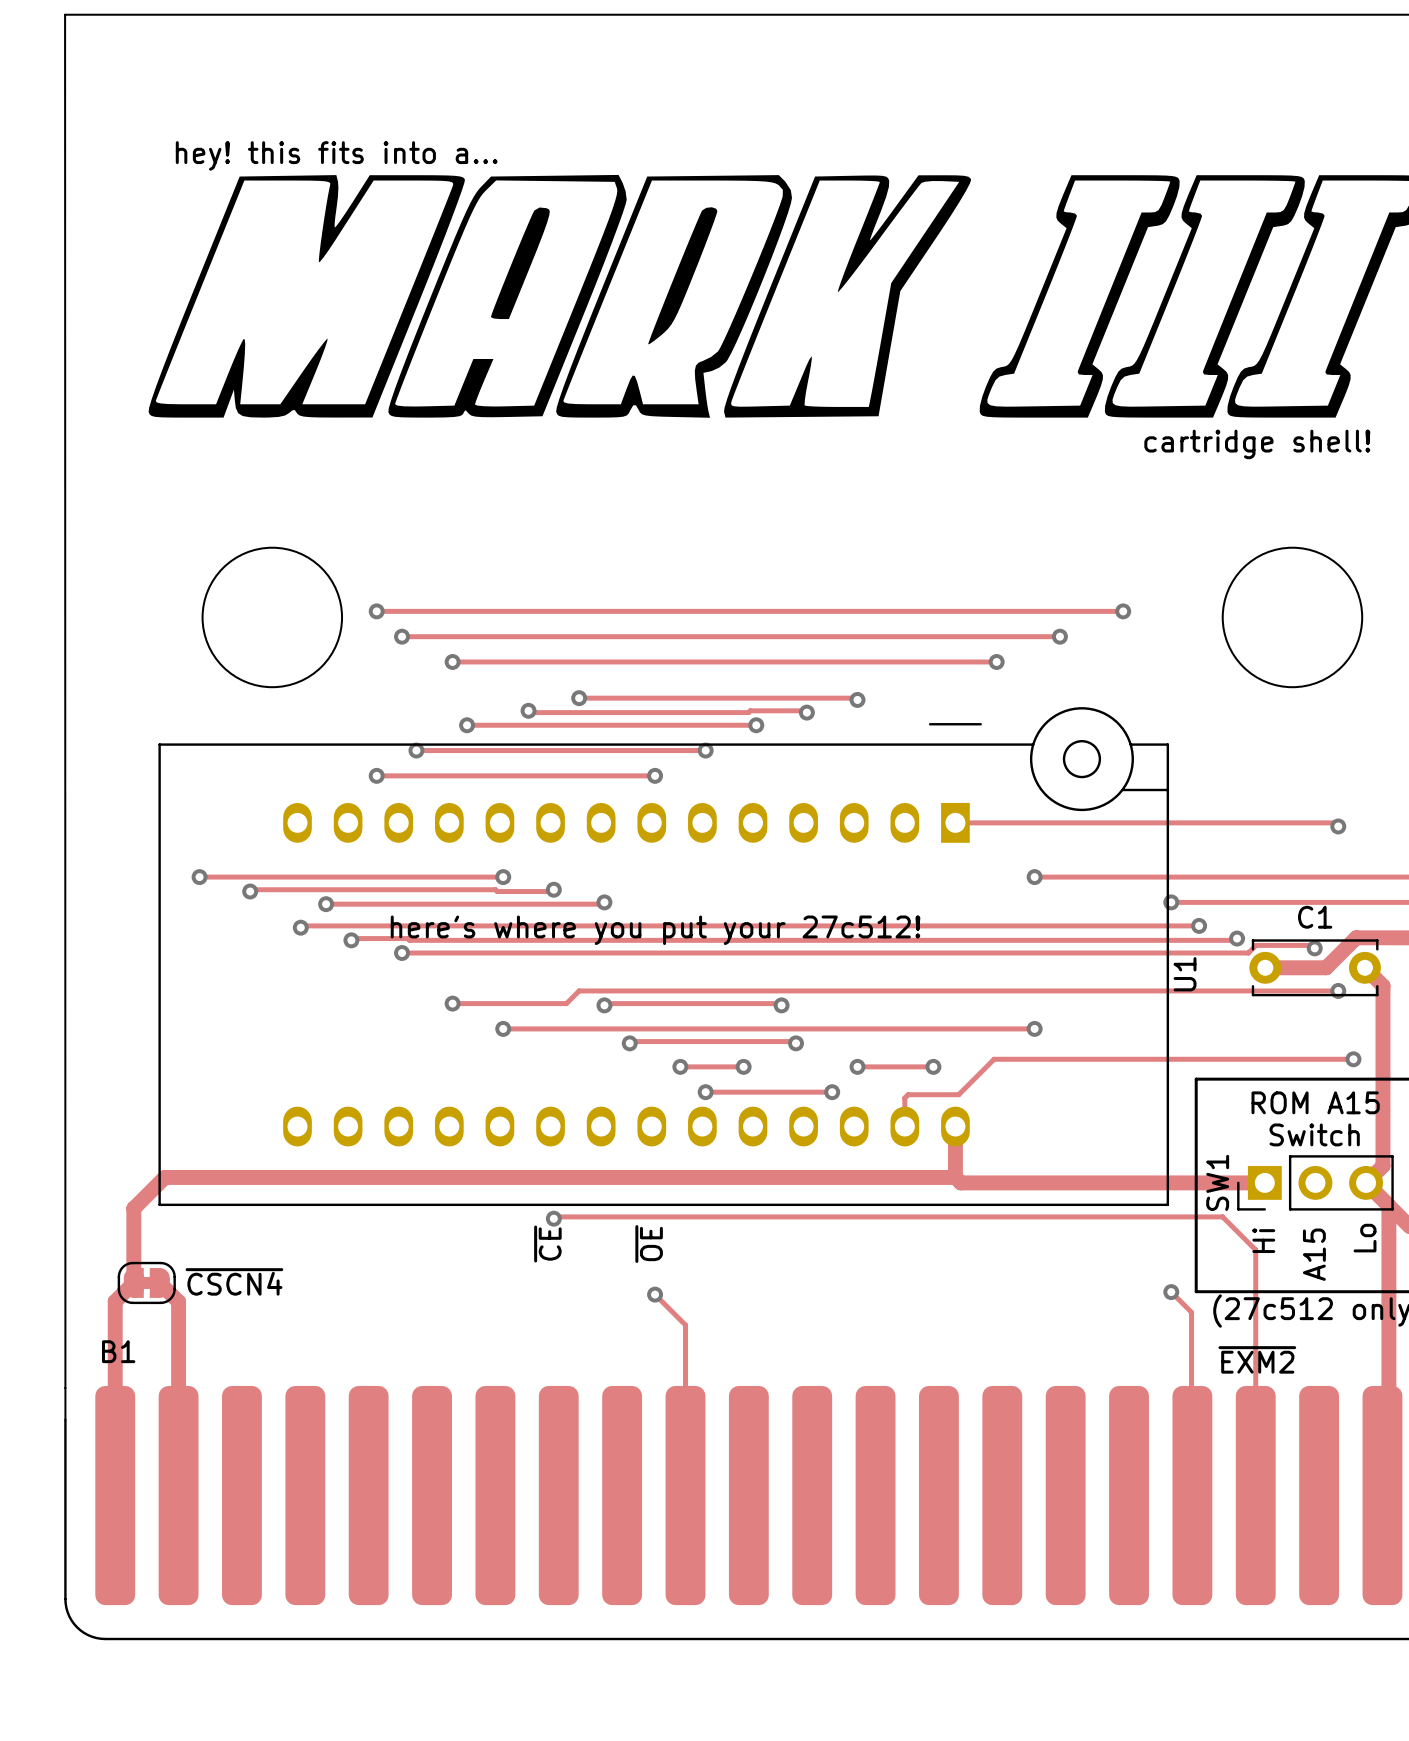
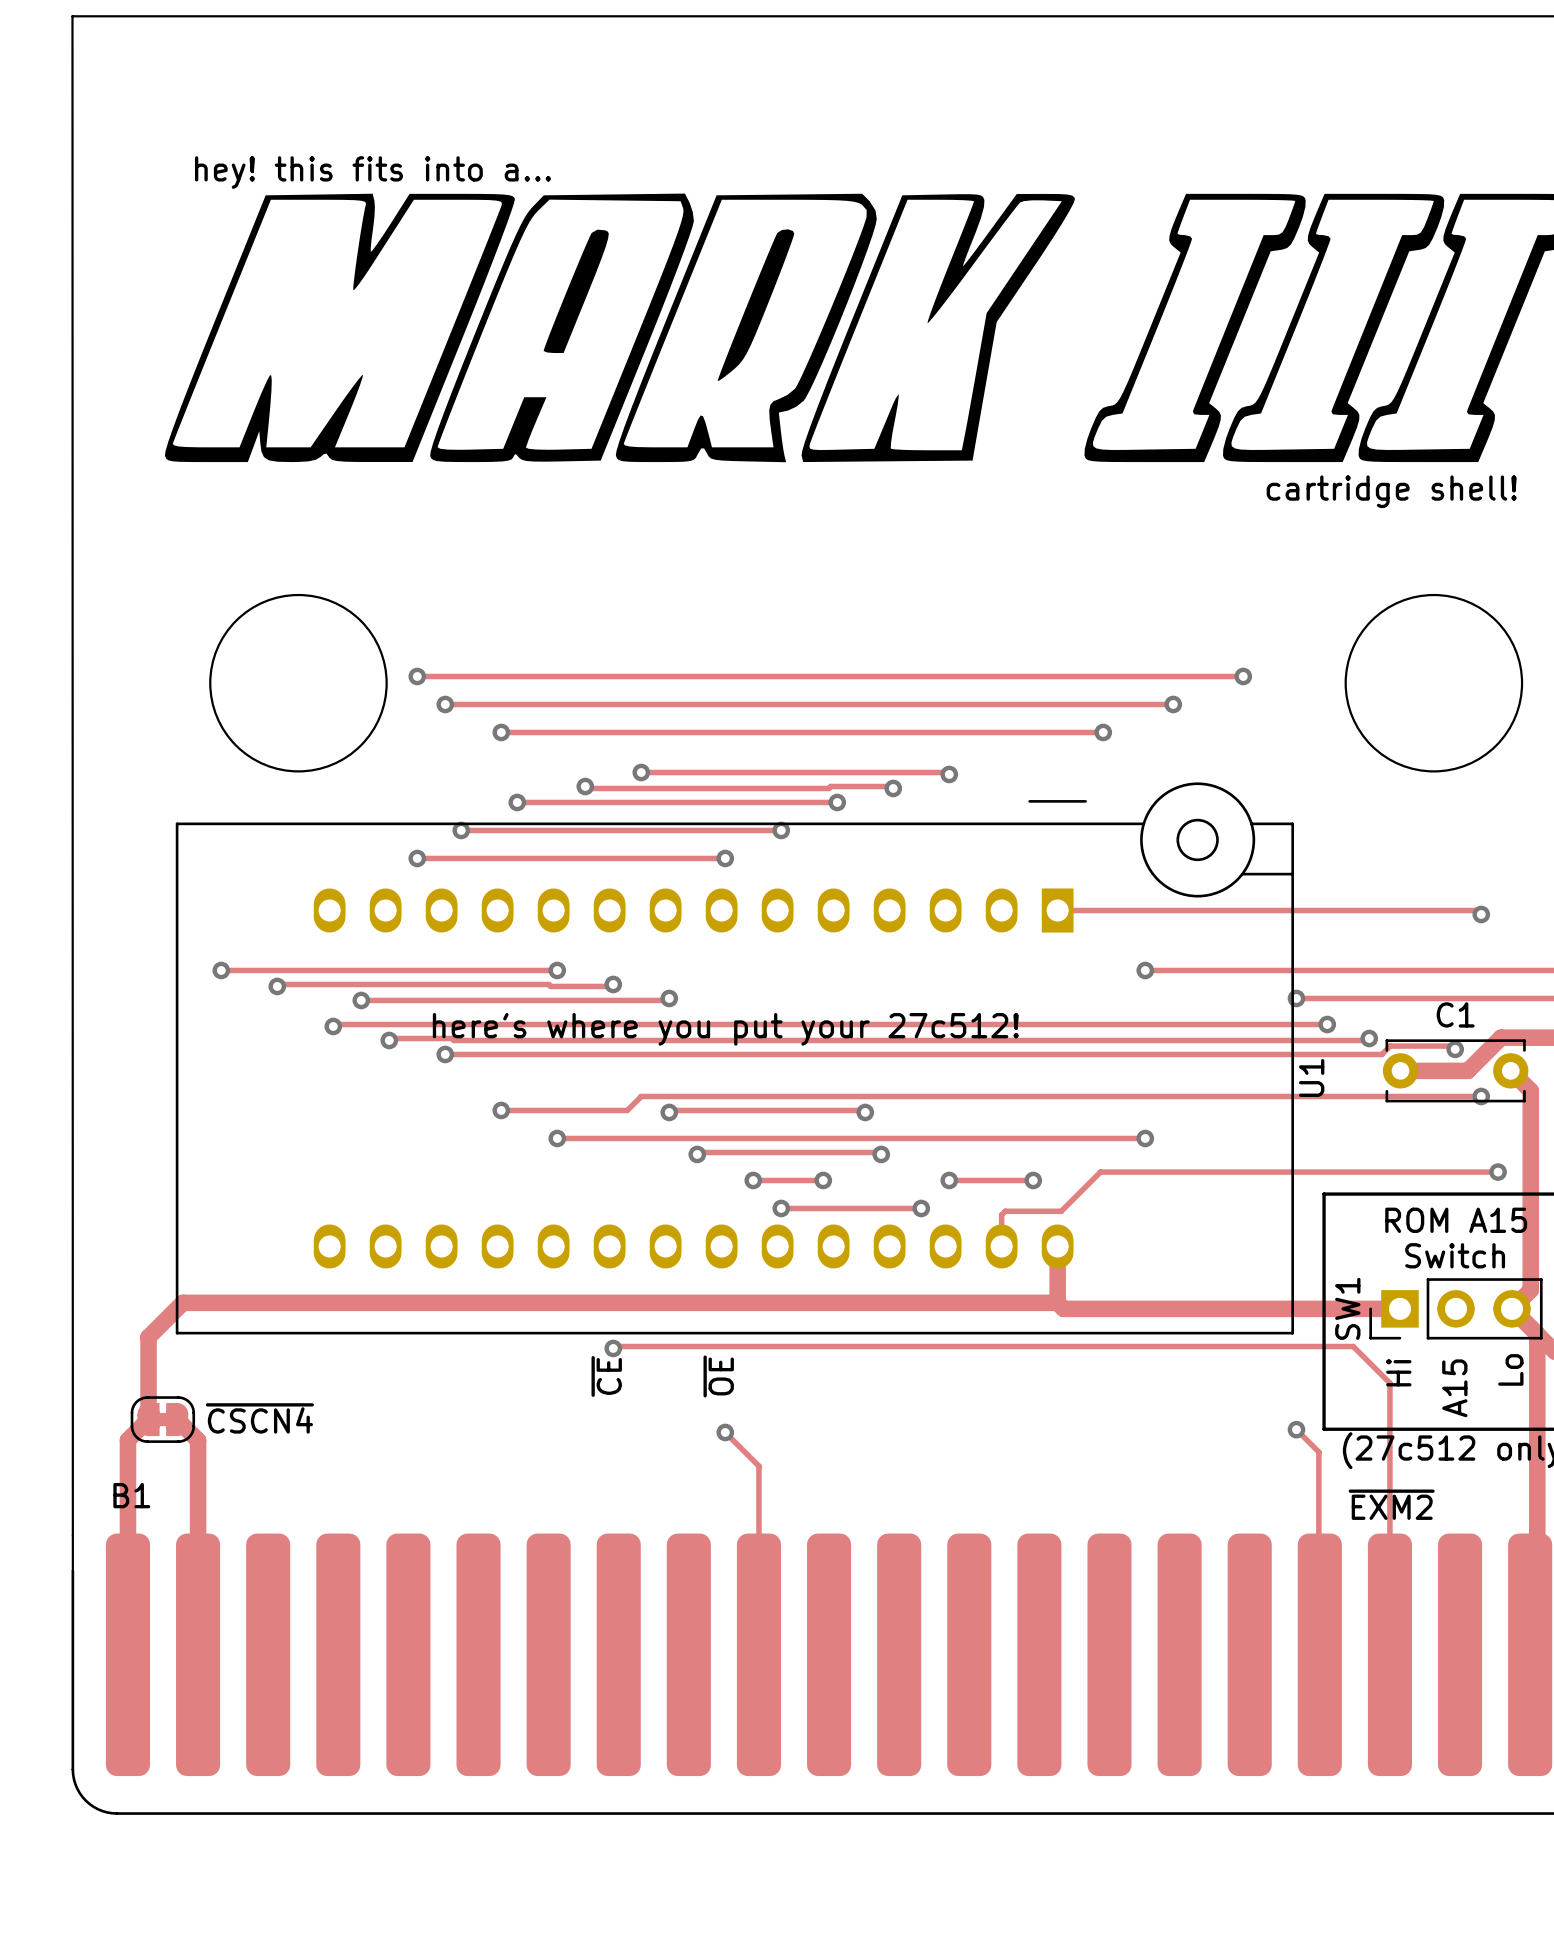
round board edge size: [201, 546, 344, 689] -> [209, 593, 388, 773]
round board edge size: [1221, 546, 1364, 689] -> [1344, 593, 1524, 773]

